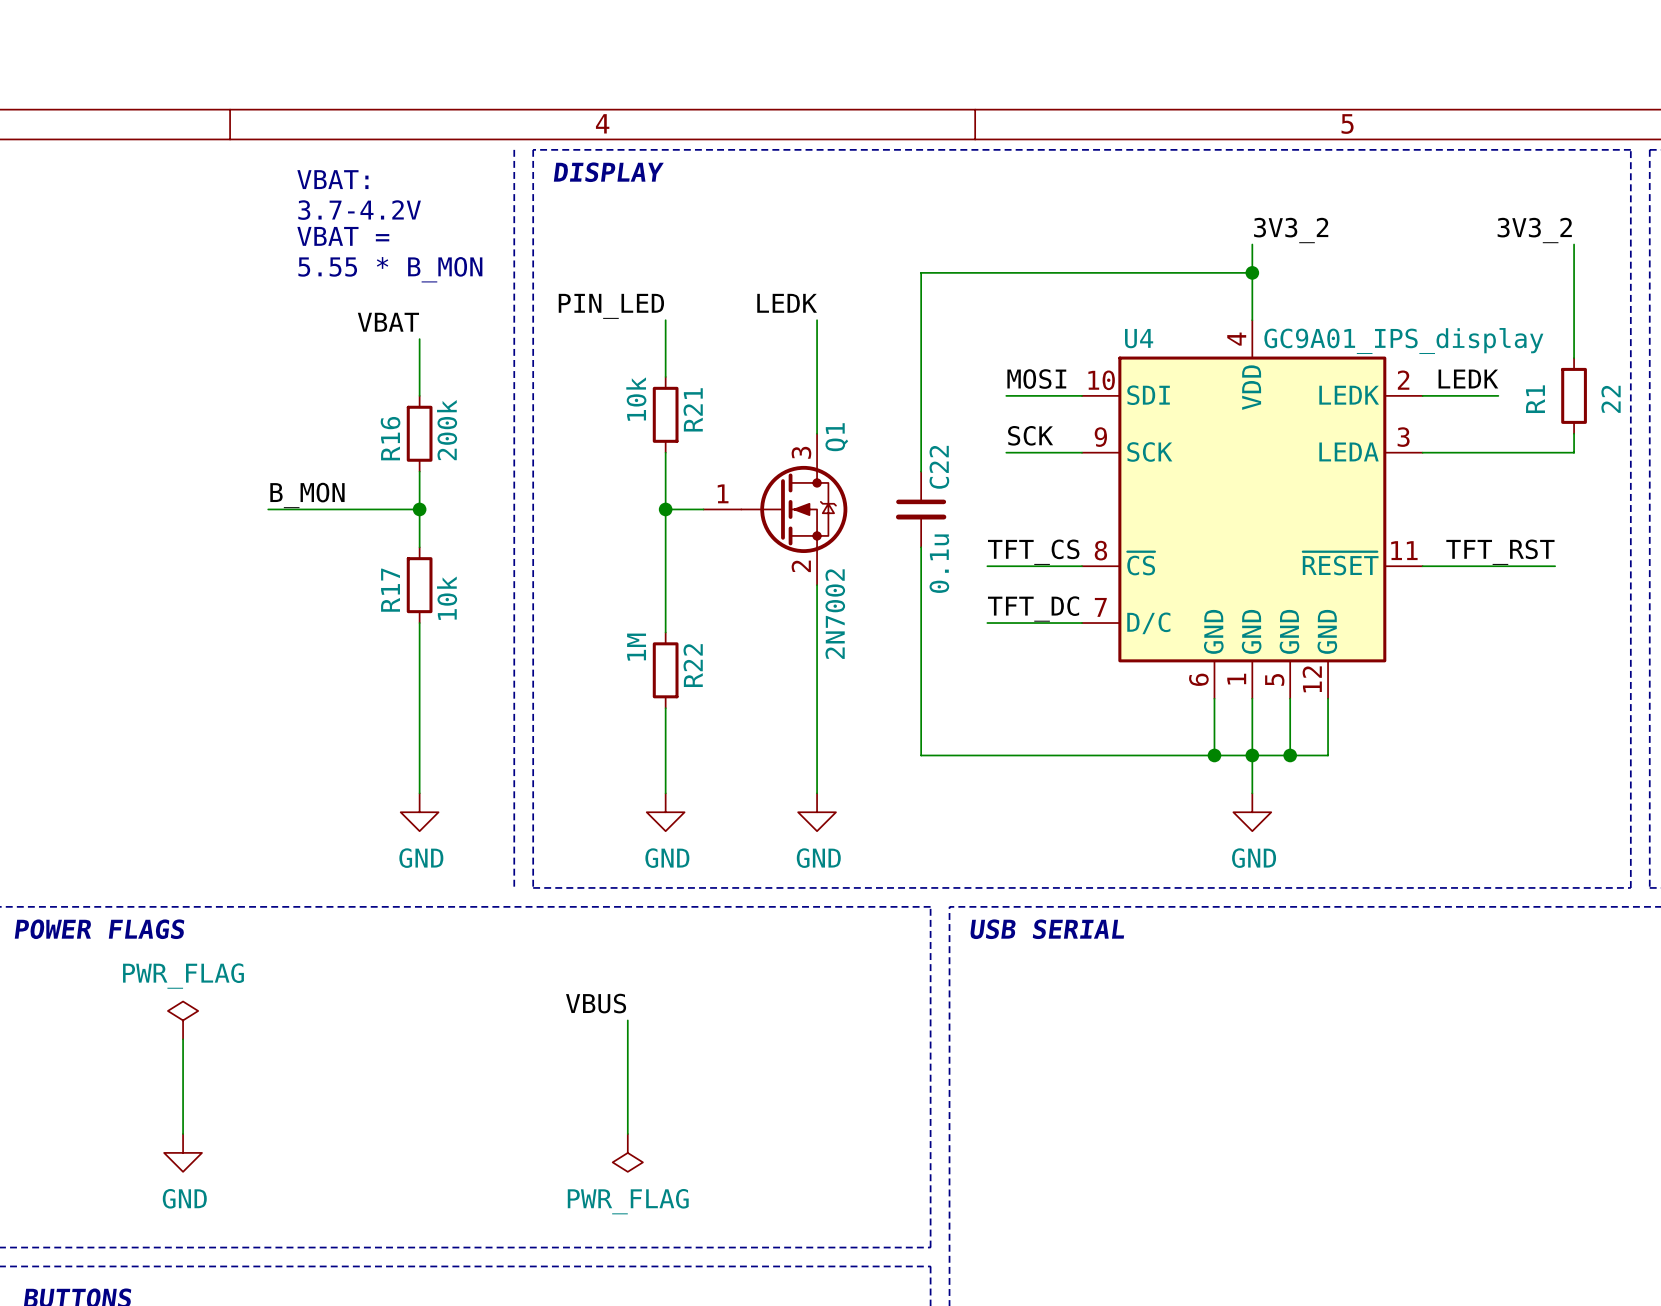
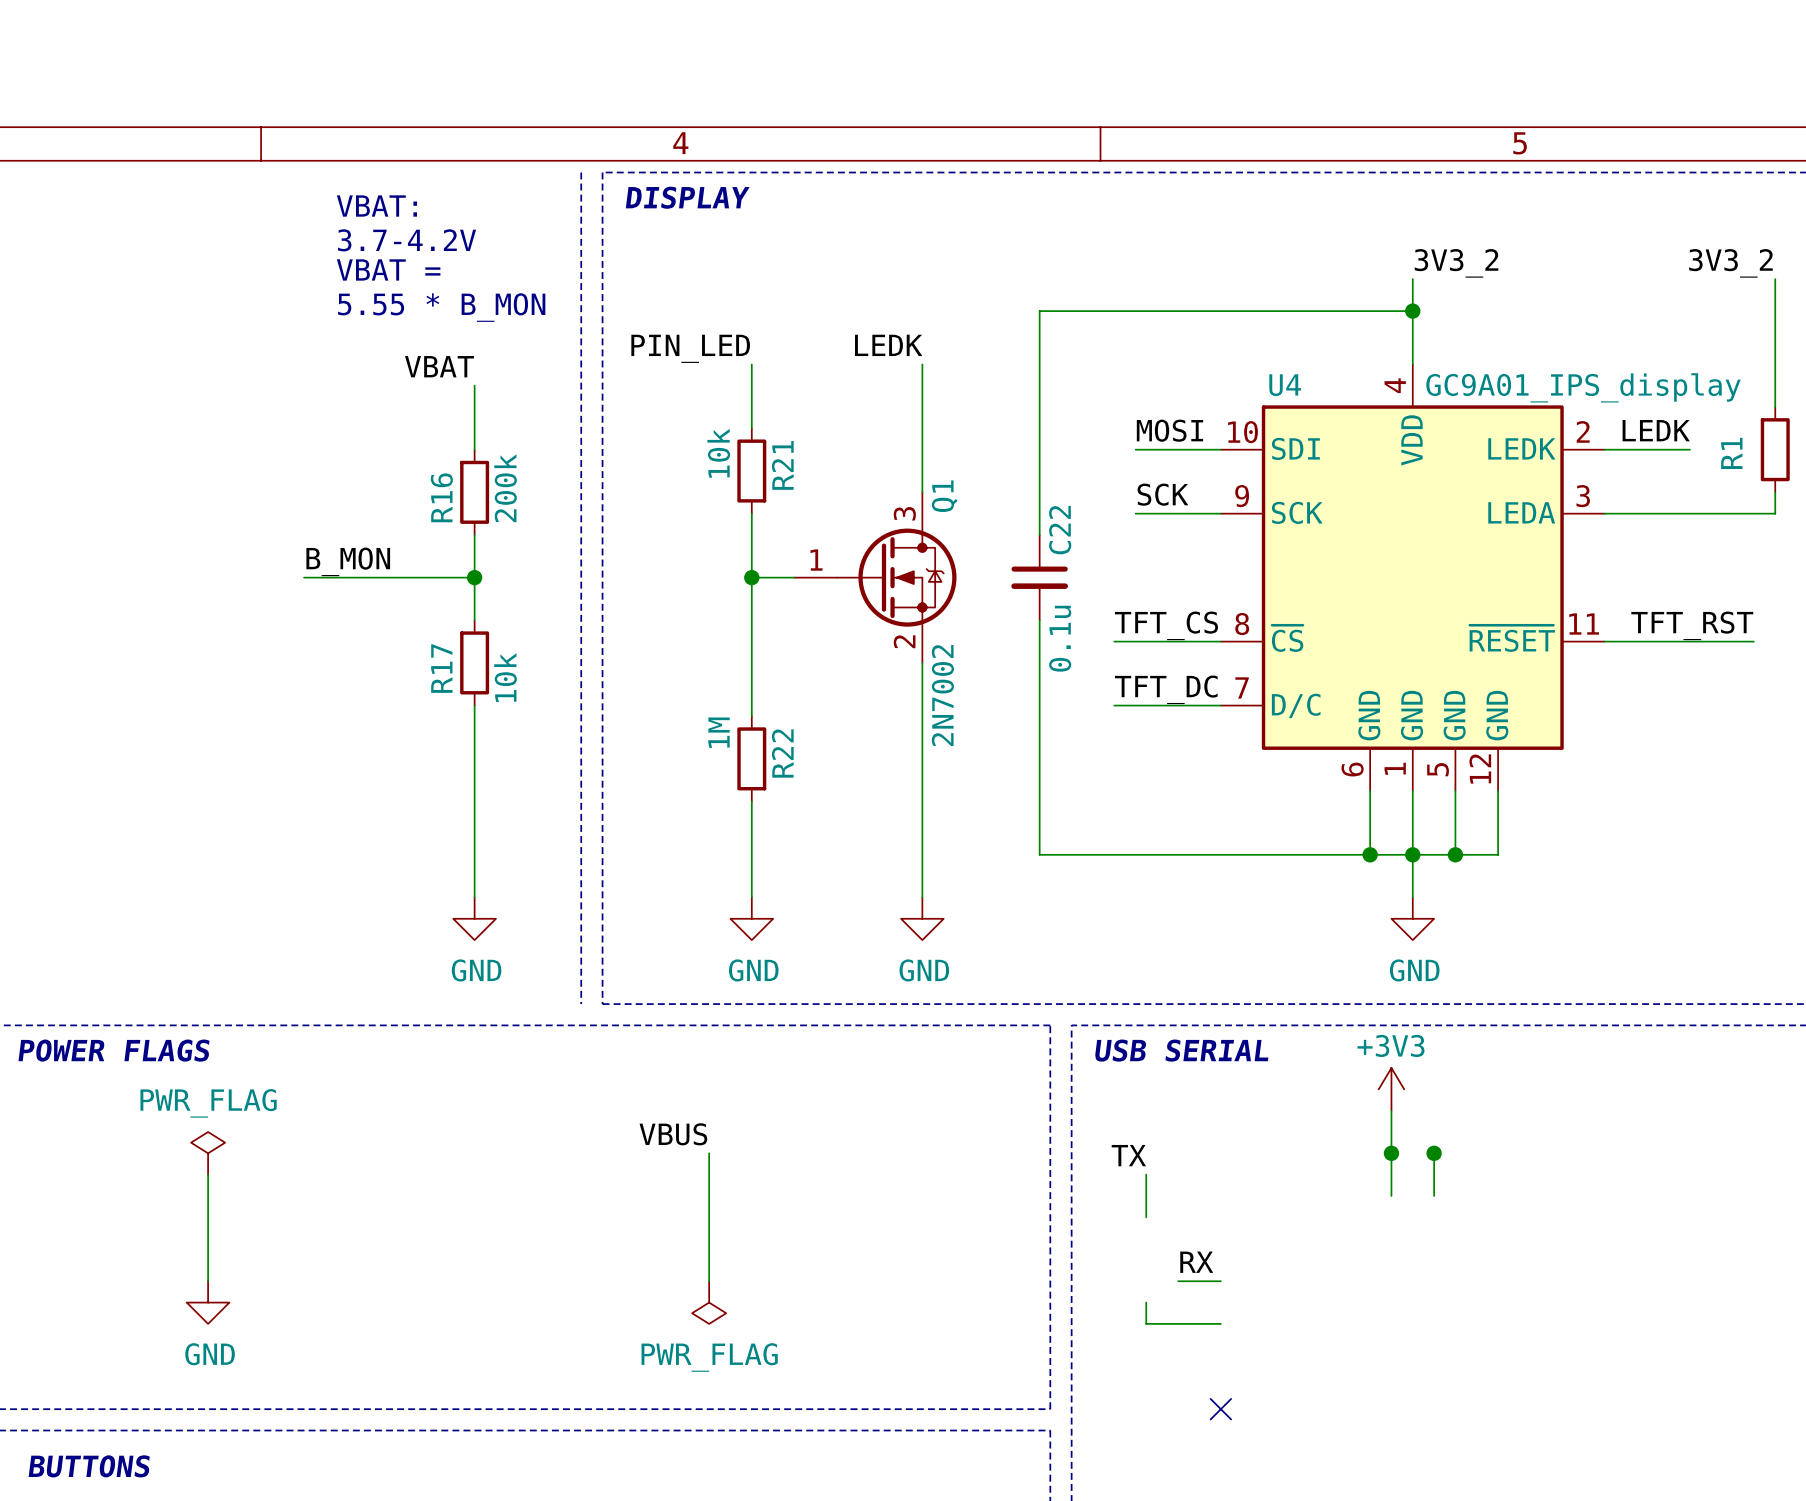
power symbol: none -> +3V3 (1391, 1089)
wire: none -> (1391, 1110) (1391, 1195)
junction: none -> (1391, 1153)
wire: none -> (1434, 1153) (1434, 1195)
junction: none -> (1434, 1153)
label: none -> TX (1128, 1155)
wire: none -> (1146, 1174) (1146, 1217)
label: none -> RX (1196, 1262)
wire: none -> (1178, 1281) (1220, 1281)
wire: none -> (1146, 1302) (1146, 1323) (1220, 1323)
no-connect mark: none -> (1220, 1409)

